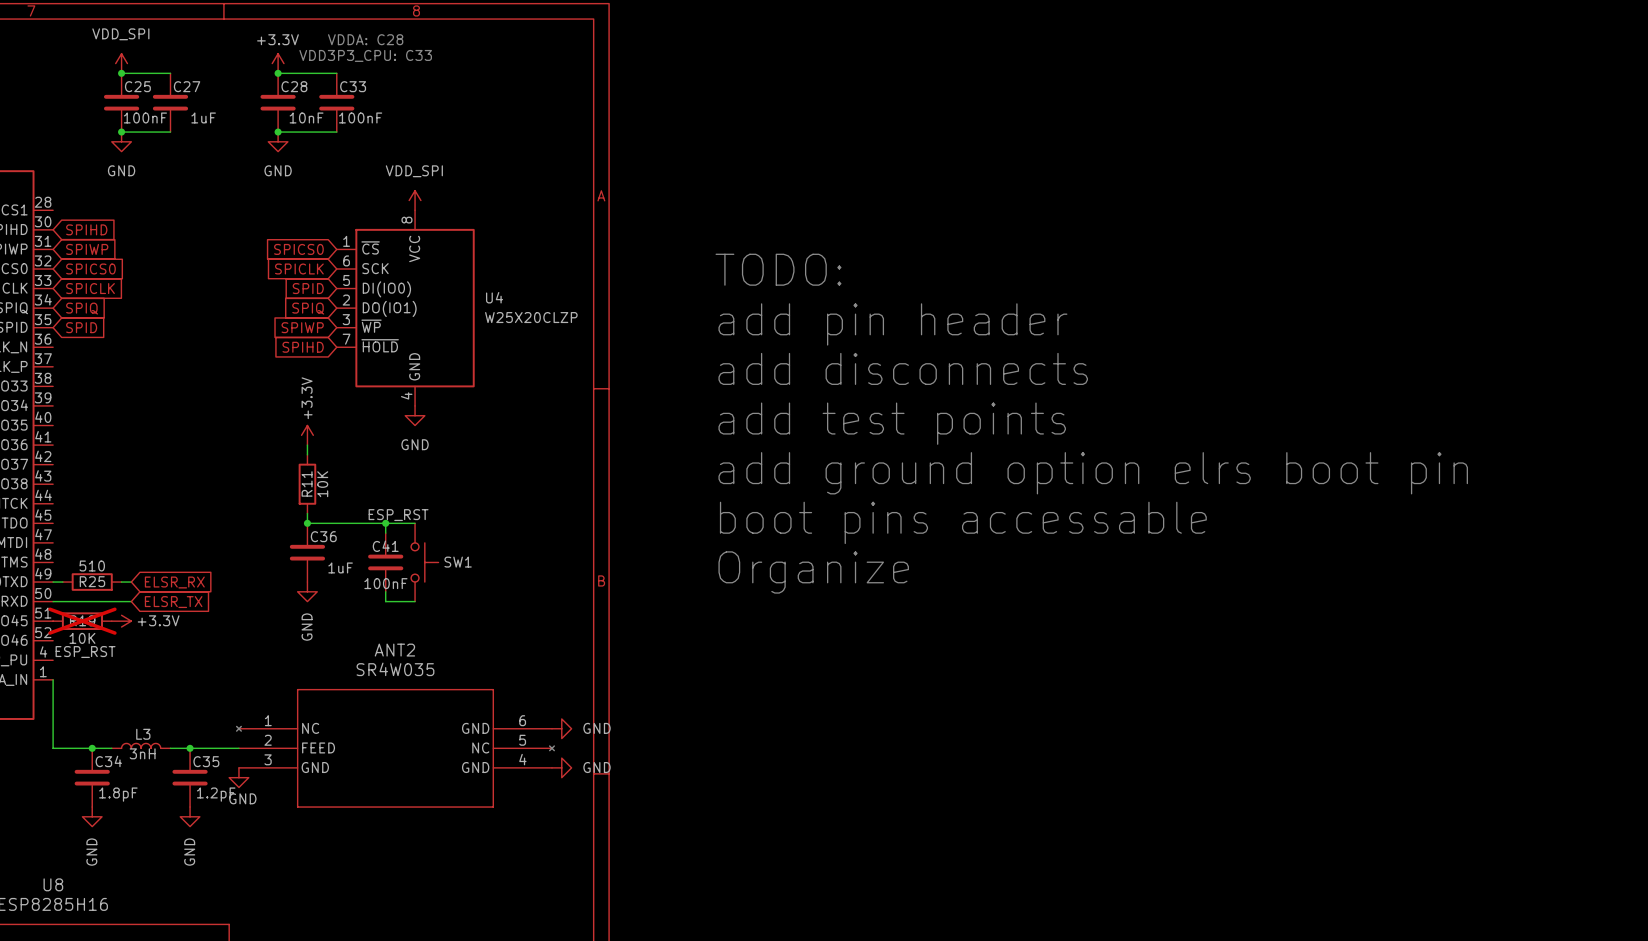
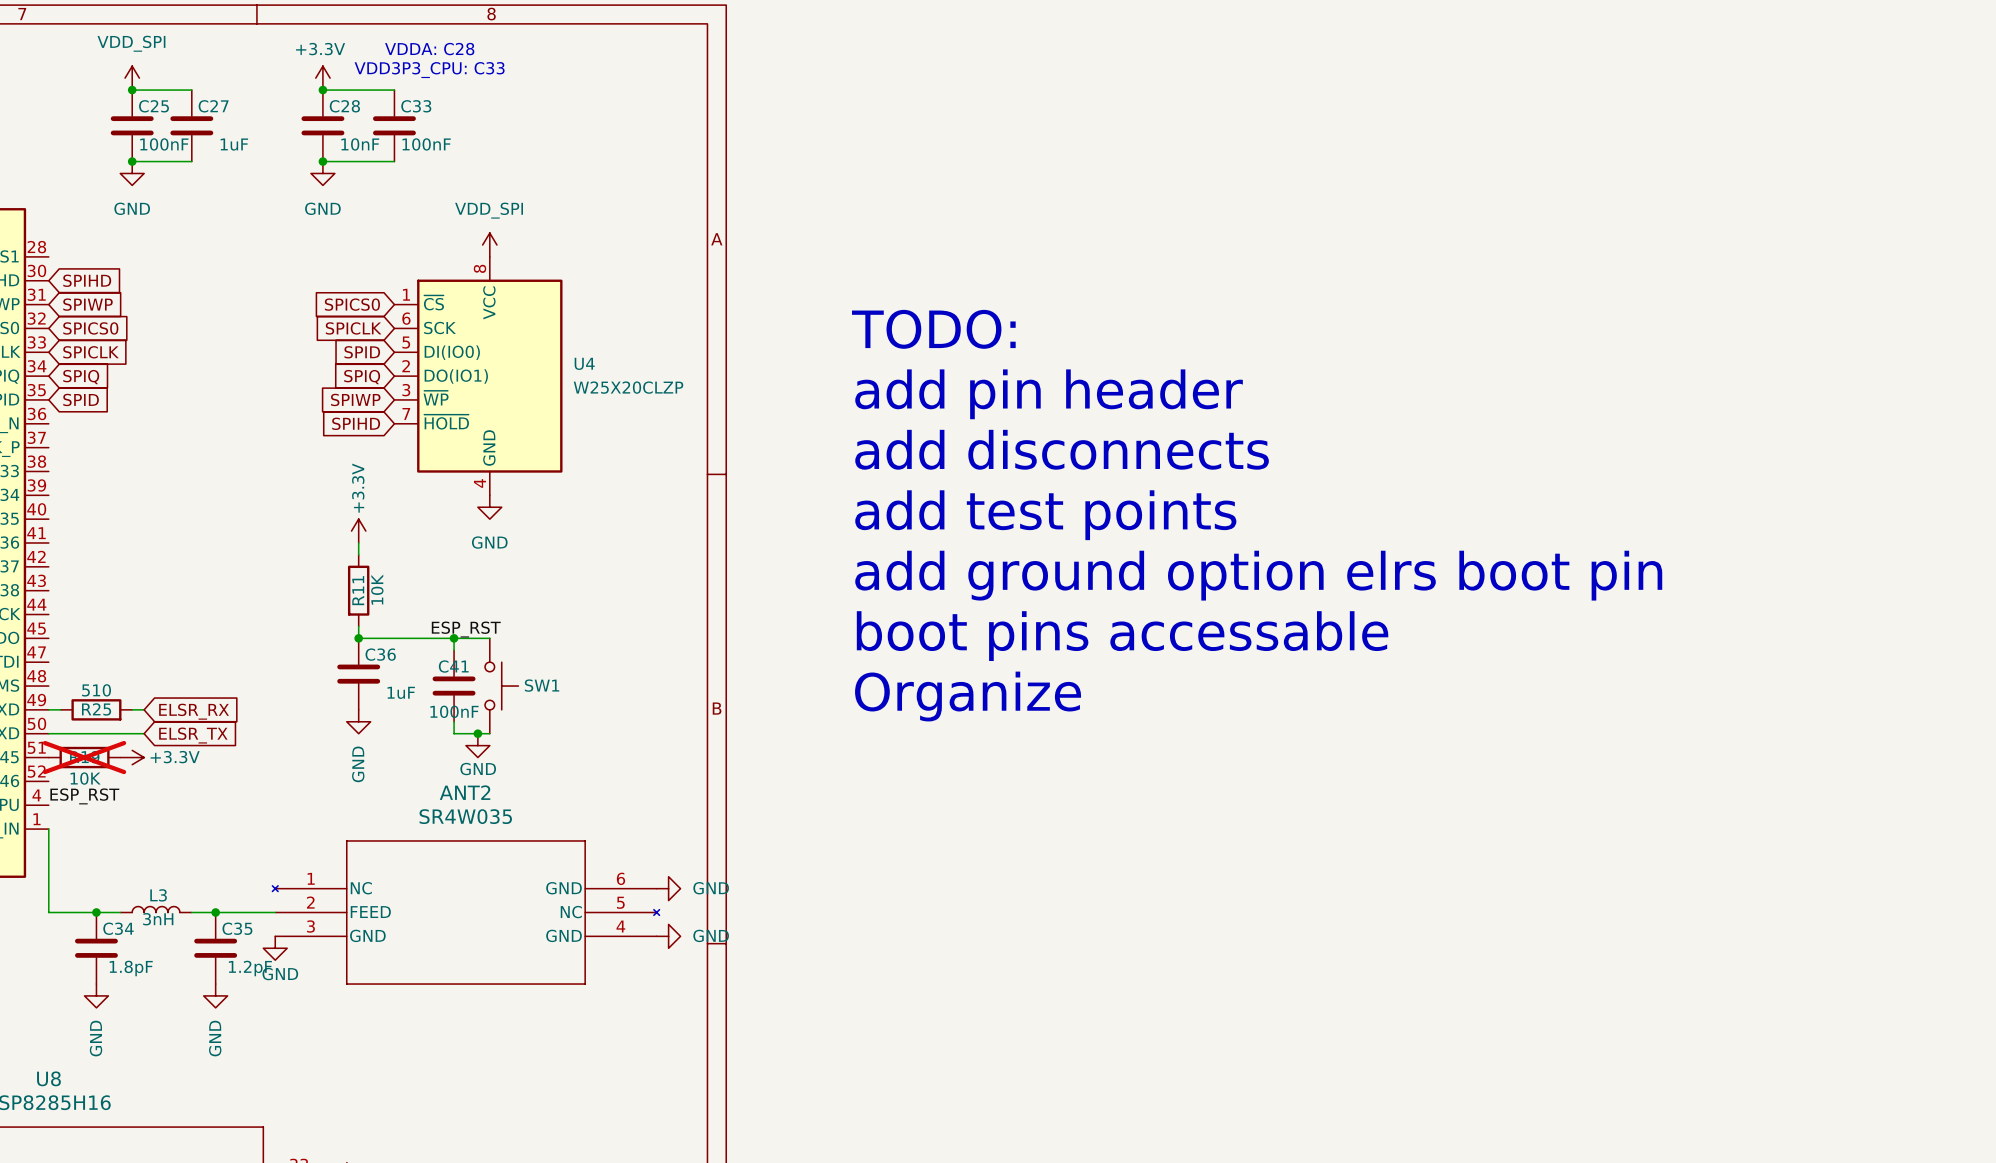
junction: none -> (477, 733)
power symbol: none -> GND (477, 745)

